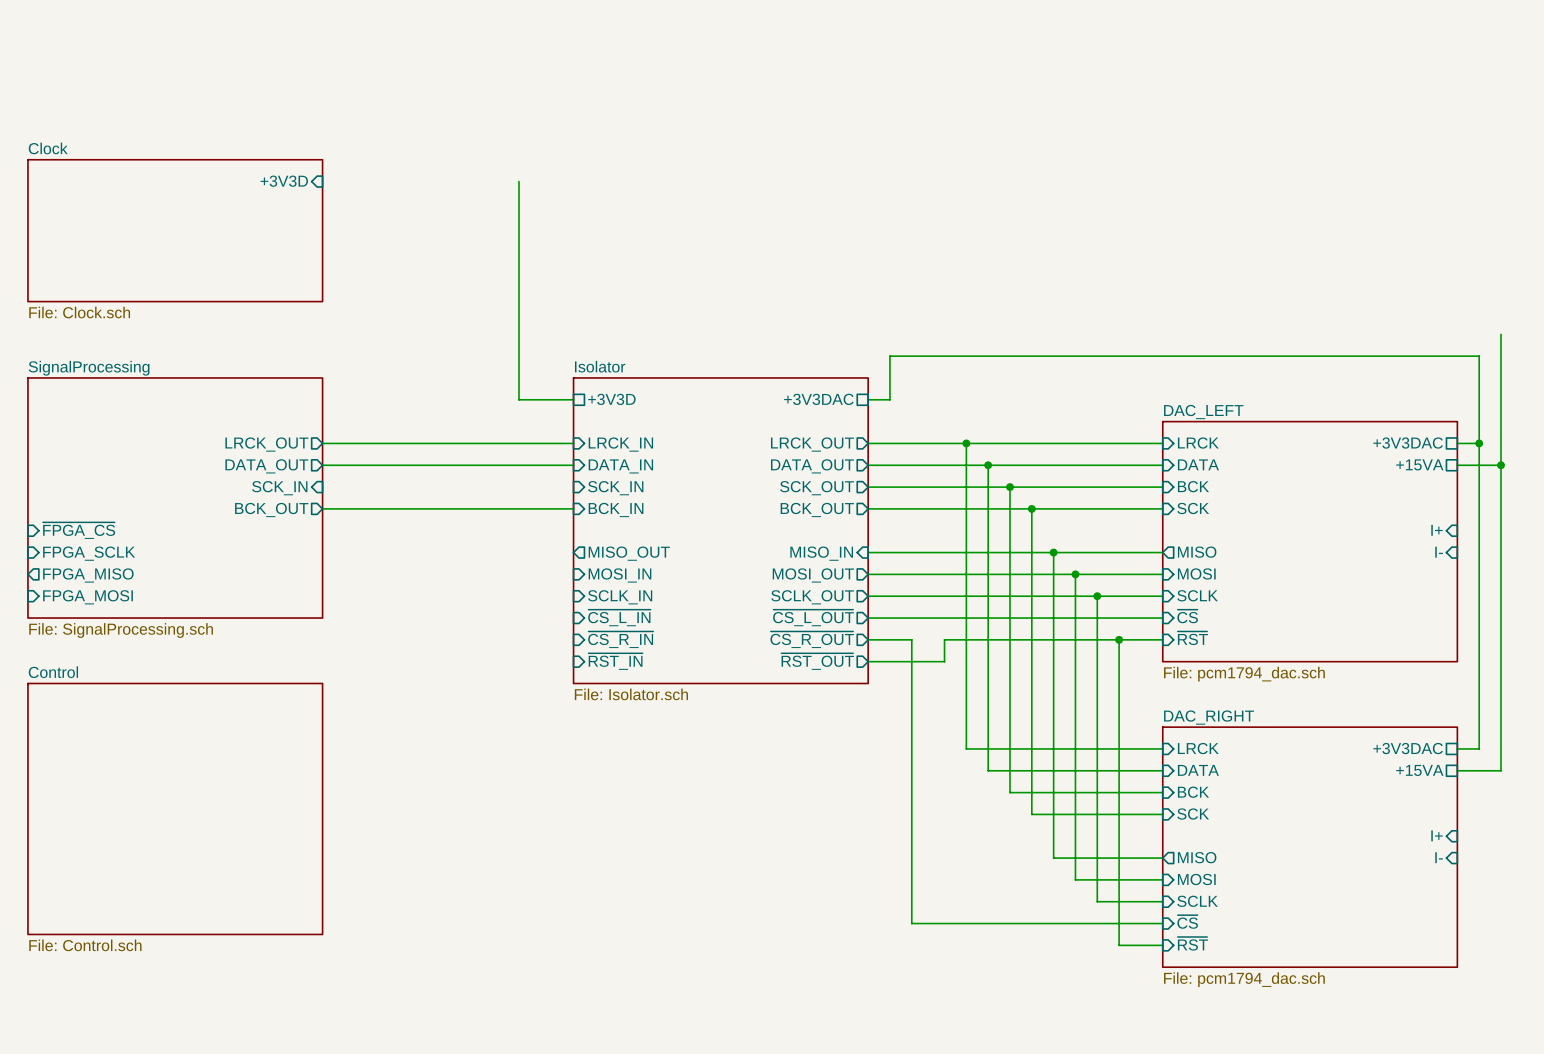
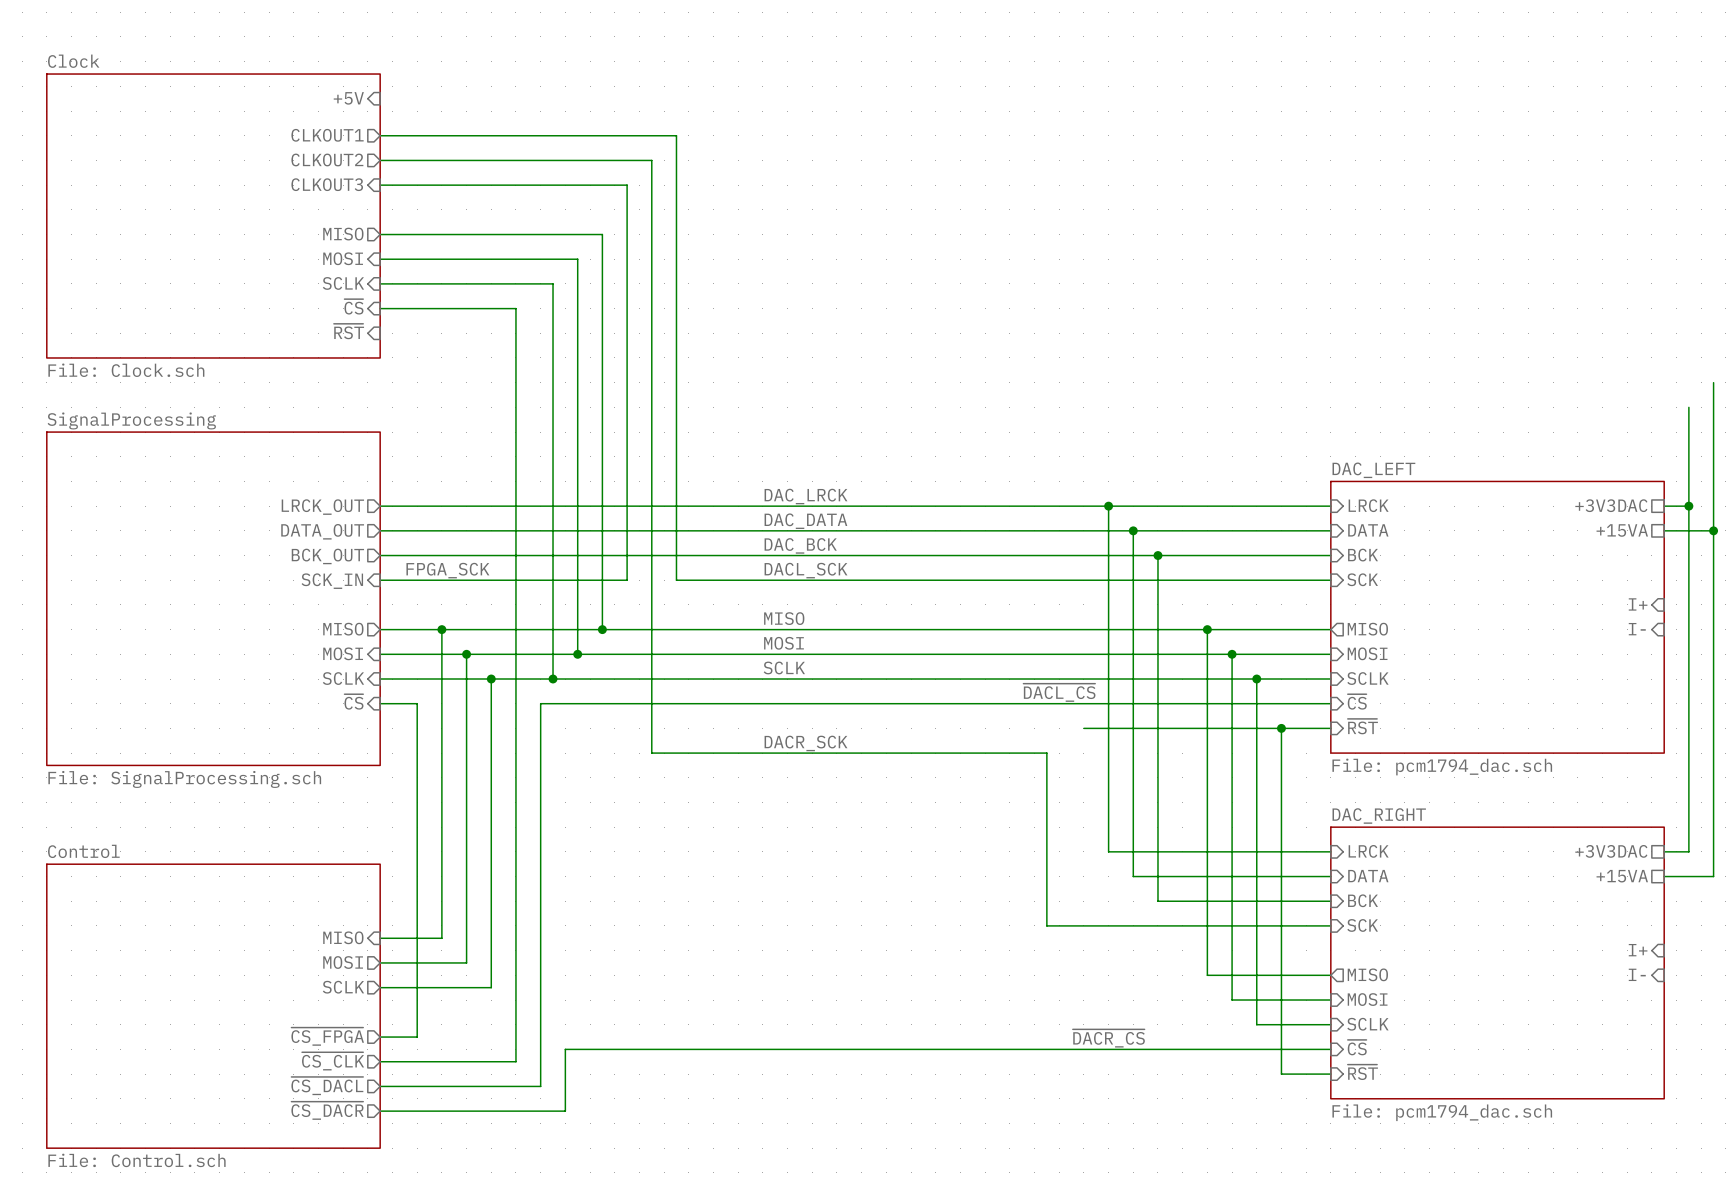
sheet pin: none -> +5V (348, 98)
sheet pin: none -> CLKOUT1 (327, 135)
wire: none -> (380, 135) (676, 135) (676, 580) (997, 580)
sheet pin: none -> CLKOUT2 (327, 159)
wire: none -> (380, 160) (651, 160) (651, 753) (997, 753)
sheet pin: none -> CLKOUT3 (327, 184)
sheet pin: +3V3D (284, 181) -> none
wire: (518, 181) (518, 203) -> (380, 234) (602, 234)
sheet Clock: none -> File: Clock.sch (213, 216)
sheet pin: none -> MISO (343, 234)
sheet pin: none -> MOSI (343, 258)
wire: none -> (380, 259) (577, 259) (577, 654)
sheet Clock: File: Clock.sch (175, 230) -> none
sheet pin: none -> SCLK (343, 283)
wire: none -> (380, 283) (553, 283) (553, 679)
sheet pin: none -> ~{CS} (353, 306)
wire: none -> (380, 308) (515, 308) (515, 1061) (380, 1061)
sheet pin: none -> ~{RST} (348, 331)
wire: (1479, 356) (889, 356) (889, 399) (868, 399) -> none
wire: (518, 399) (573, 399) -> (602, 456) (602, 629)
sheet pin: +3V3D (611, 399) -> none
sheet pin: +3V3DAC (818, 399) -> none
label: none -> DAC_LRCK (806, 496)
wire: none -> (664, 506) (997, 506)
sheet pin: LRCK_IN (620, 444) -> none
sheet pin: LRCK_OUT (812, 444) -> none
label: none -> DAC_DATA (805, 521)
wire: none -> (664, 530) (997, 530)
sheet pin: DATA_IN (620, 466) -> none
sheet pin: DATA_OUT (812, 466) -> none
label: none -> DAC_BCK (800, 545)
wire: none -> (380, 555) (997, 555)
sheet pin shape: input (279, 488) -> output (327, 556)
sheet pin: SCK_IN (279, 488) -> BCK_OUT (327, 556)
sheet pin: SCK_IN (615, 488) -> none
sheet pin: SCK_OUT (817, 488) -> none
sheet SignalProcessing: File: SignalProcessing.sch (175, 498) -> none
label: none -> FPGA_SCK (447, 570)
label: none -> DACL_SCK (806, 570)
wire: (540, 508) (573, 508) -> (627, 580) (627, 185) (380, 185)
wire: (1031, 508) (1031, 814) -> none
junction: (1031, 508) -> none
sheet pin shape: output (271, 510) -> input (332, 581)
sheet pin: BCK_OUT (271, 510) -> SCK_IN (332, 581)
sheet pin: BCK_IN (616, 510) -> none
sheet pin: BCK_OUT (817, 510) -> none
sheet SignalProcessing: none -> File: SignalProcessing.sch (213, 598)
sheet pin: ~{FPGA_CS} (79, 530) -> none
sheet Isolator: File: Isolator.sch (720, 530) -> none
label: none -> MISO (784, 618)
sheet pin: none -> MISO (343, 629)
wire: none -> (380, 629) (997, 629)
wire: none -> (441, 629) (441, 938) (380, 938)
junction: none -> (441, 629)
junction: none -> (602, 629)
sheet pin: FPGA_SCLK (89, 553) -> none
sheet pin: MISO_OUT (629, 553) -> none
sheet pin: MISO_IN (821, 553) -> none
label: none -> MOSI (783, 643)
sheet pin: none -> MOSI (343, 653)
wire: none -> (380, 654) (997, 654)
wire: none -> (466, 654) (466, 962) (380, 962)
junction: none -> (466, 654)
junction: none -> (577, 654)
sheet pin: FPGA_MISO (88, 575) -> none
sheet pin: MOSI_IN (620, 575) -> none
sheet pin: MOSI_OUT (813, 575) -> none
label: none -> SCLK (784, 667)
sheet pin: none -> SCLK (343, 678)
wire: none -> (380, 679) (997, 679)
wire: none -> (491, 679) (491, 987) (380, 987)
junction: none -> (491, 679)
junction: none -> (553, 679)
sheet pin: FPGA_MOSI (88, 597) -> none
sheet pin: SCLK_IN (620, 597) -> none
sheet pin: SCLK_OUT (812, 597) -> none
label: none -> ~{DACL_CS} (1059, 692)
sheet pin: none -> ~{CS} (353, 701)
sheet pin: ~{CS_L_IN} (619, 617) -> none
sheet pin: ~{CS_L_OUT} (813, 617) -> none
wire: none -> (380, 703) (417, 703) (417, 1037) (380, 1037)
wire: none -> (997, 703) (540, 703) (540, 1086) (380, 1086)
sheet pin: ~{CS_R_IN} (620, 639) -> none
sheet pin: ~{CS_R_OUT} (812, 639) -> none
wire: (868, 639) (911, 639) (911, 661) (944, 661) (944, 639) -> none
label: none -> DACR_SCK (806, 743)
sheet pin: ~{RST_IN} (615, 661) -> none
sheet pin: ~{RST_OUT} (817, 661) -> none
sheet Control position: (175, 808) -> (213, 1006)
wire: (911, 814) (911, 923) -> (1046, 925) (1182, 925)
sheet pin: none -> MISO (343, 937)
sheet pin: none -> MOSI (343, 962)
sheet pin: none -> SCLK (343, 987)
sheet pin: none -> ~{CS_FPGA} (327, 1036)
label: none -> ~{DACR_CS} (1108, 1038)
wire: none -> (1046, 1049) (565, 1049) (565, 1111) (380, 1111)
sheet pin: none -> ~{CS_CLK} (333, 1061)
sheet pin: none -> ~{CS_DACL} (327, 1086)
sheet pin: none -> ~{CS_DACR} (327, 1110)

